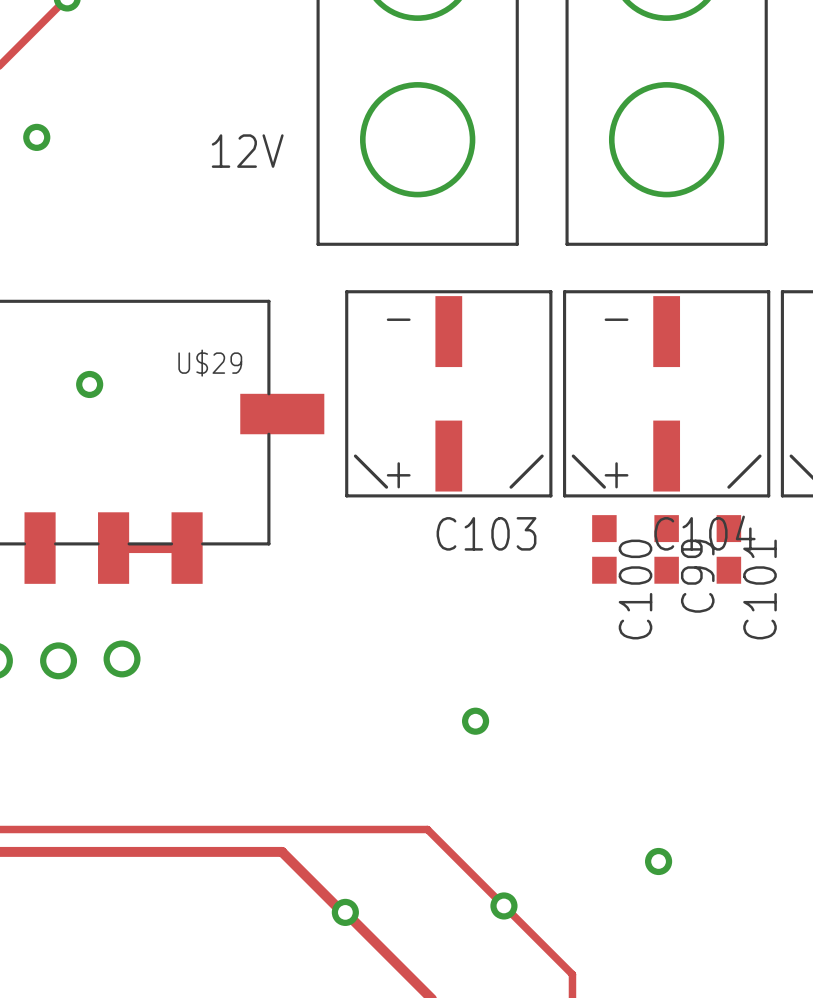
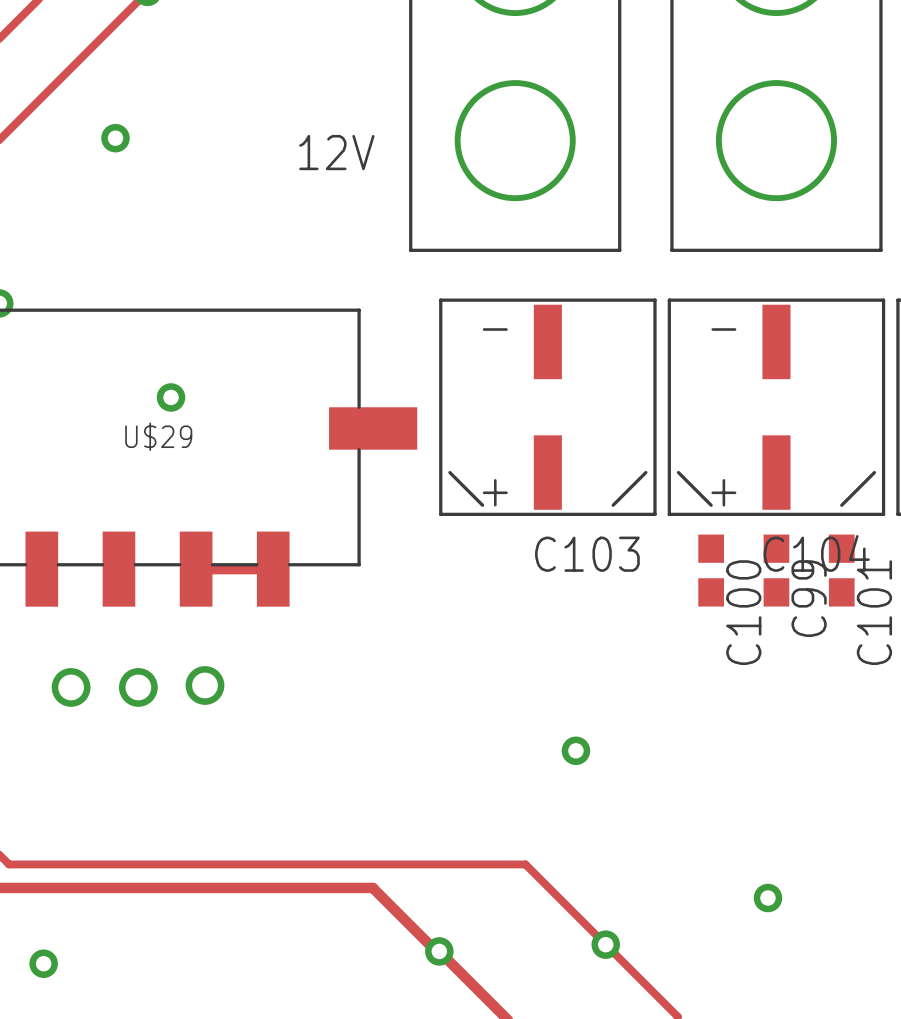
U$29 name position: U$29 (210, 363) -> U$29 (158, 436)

